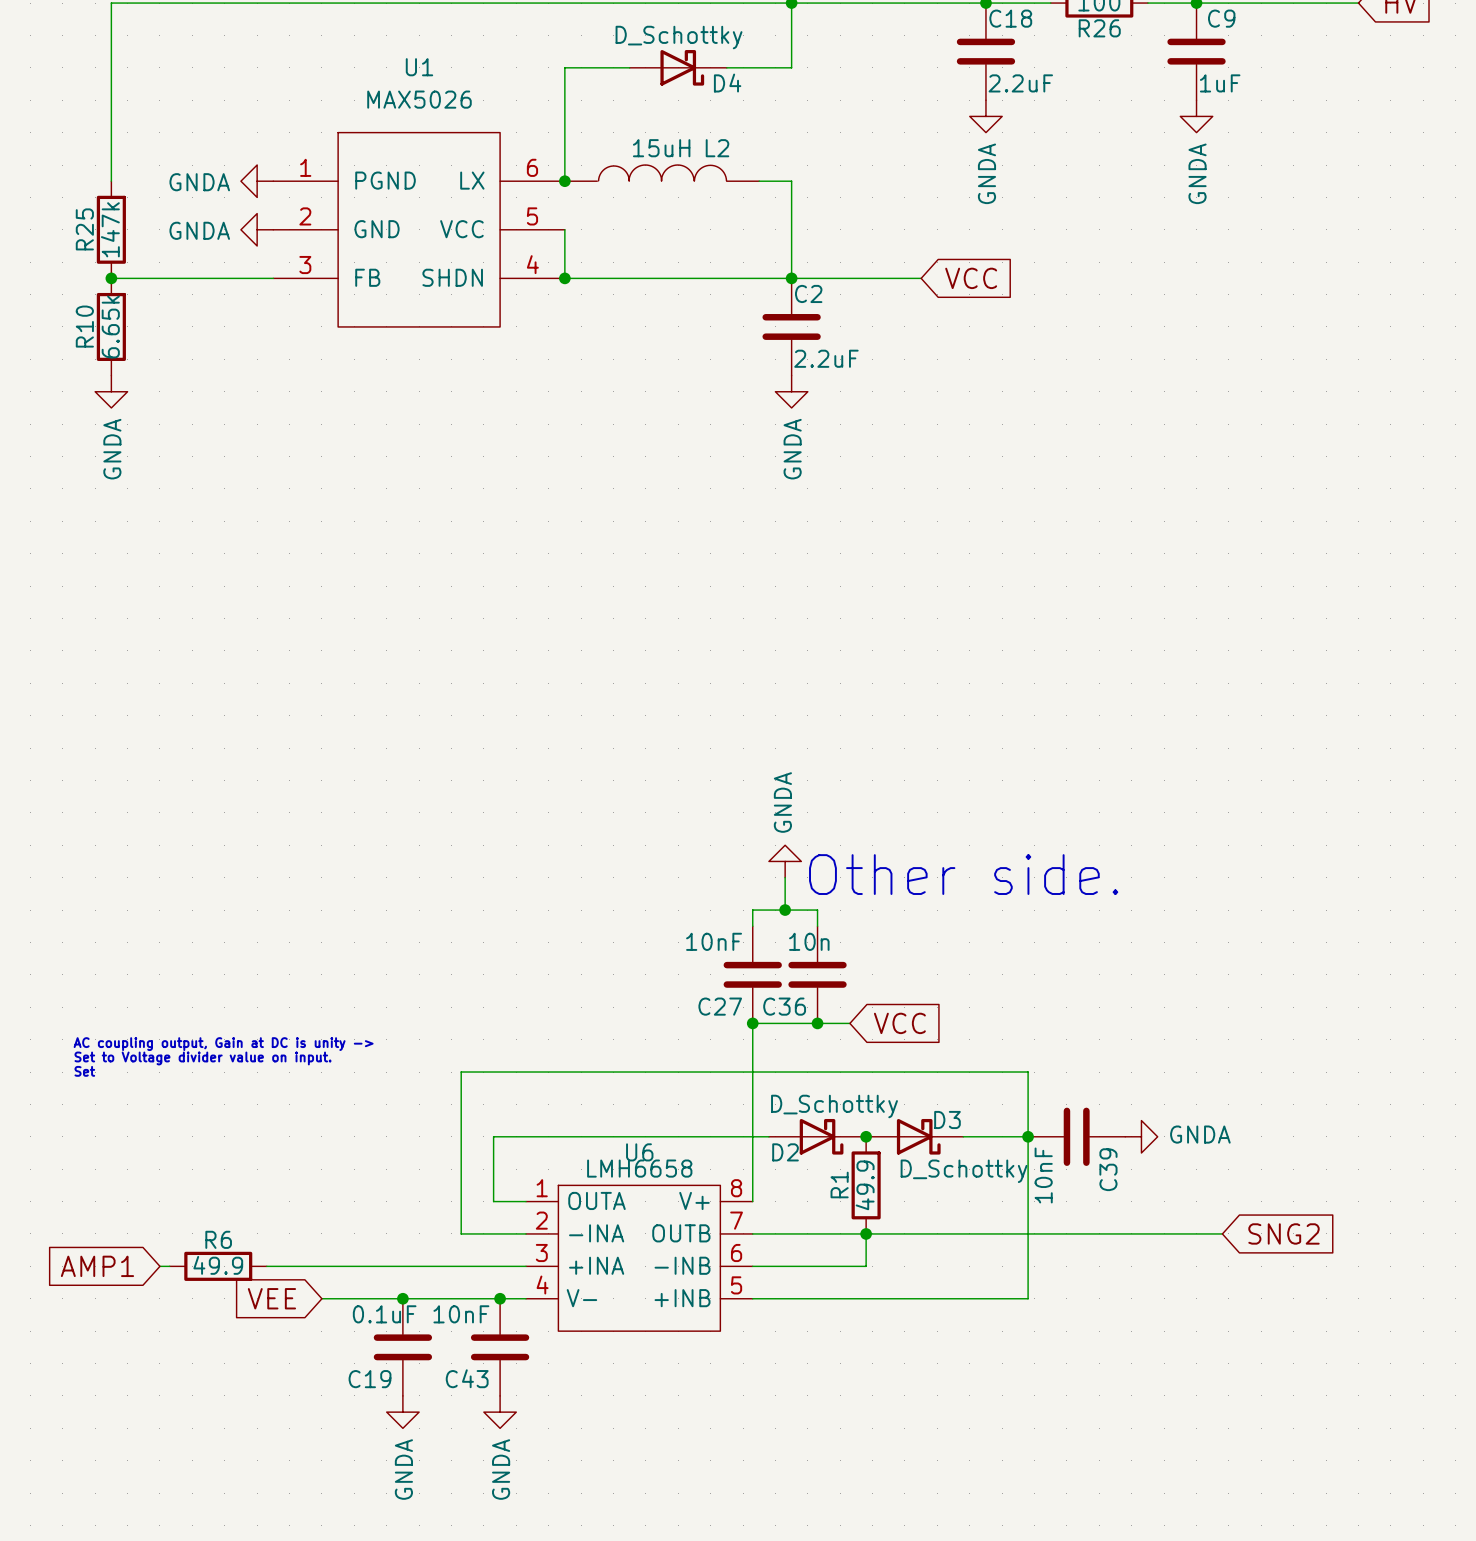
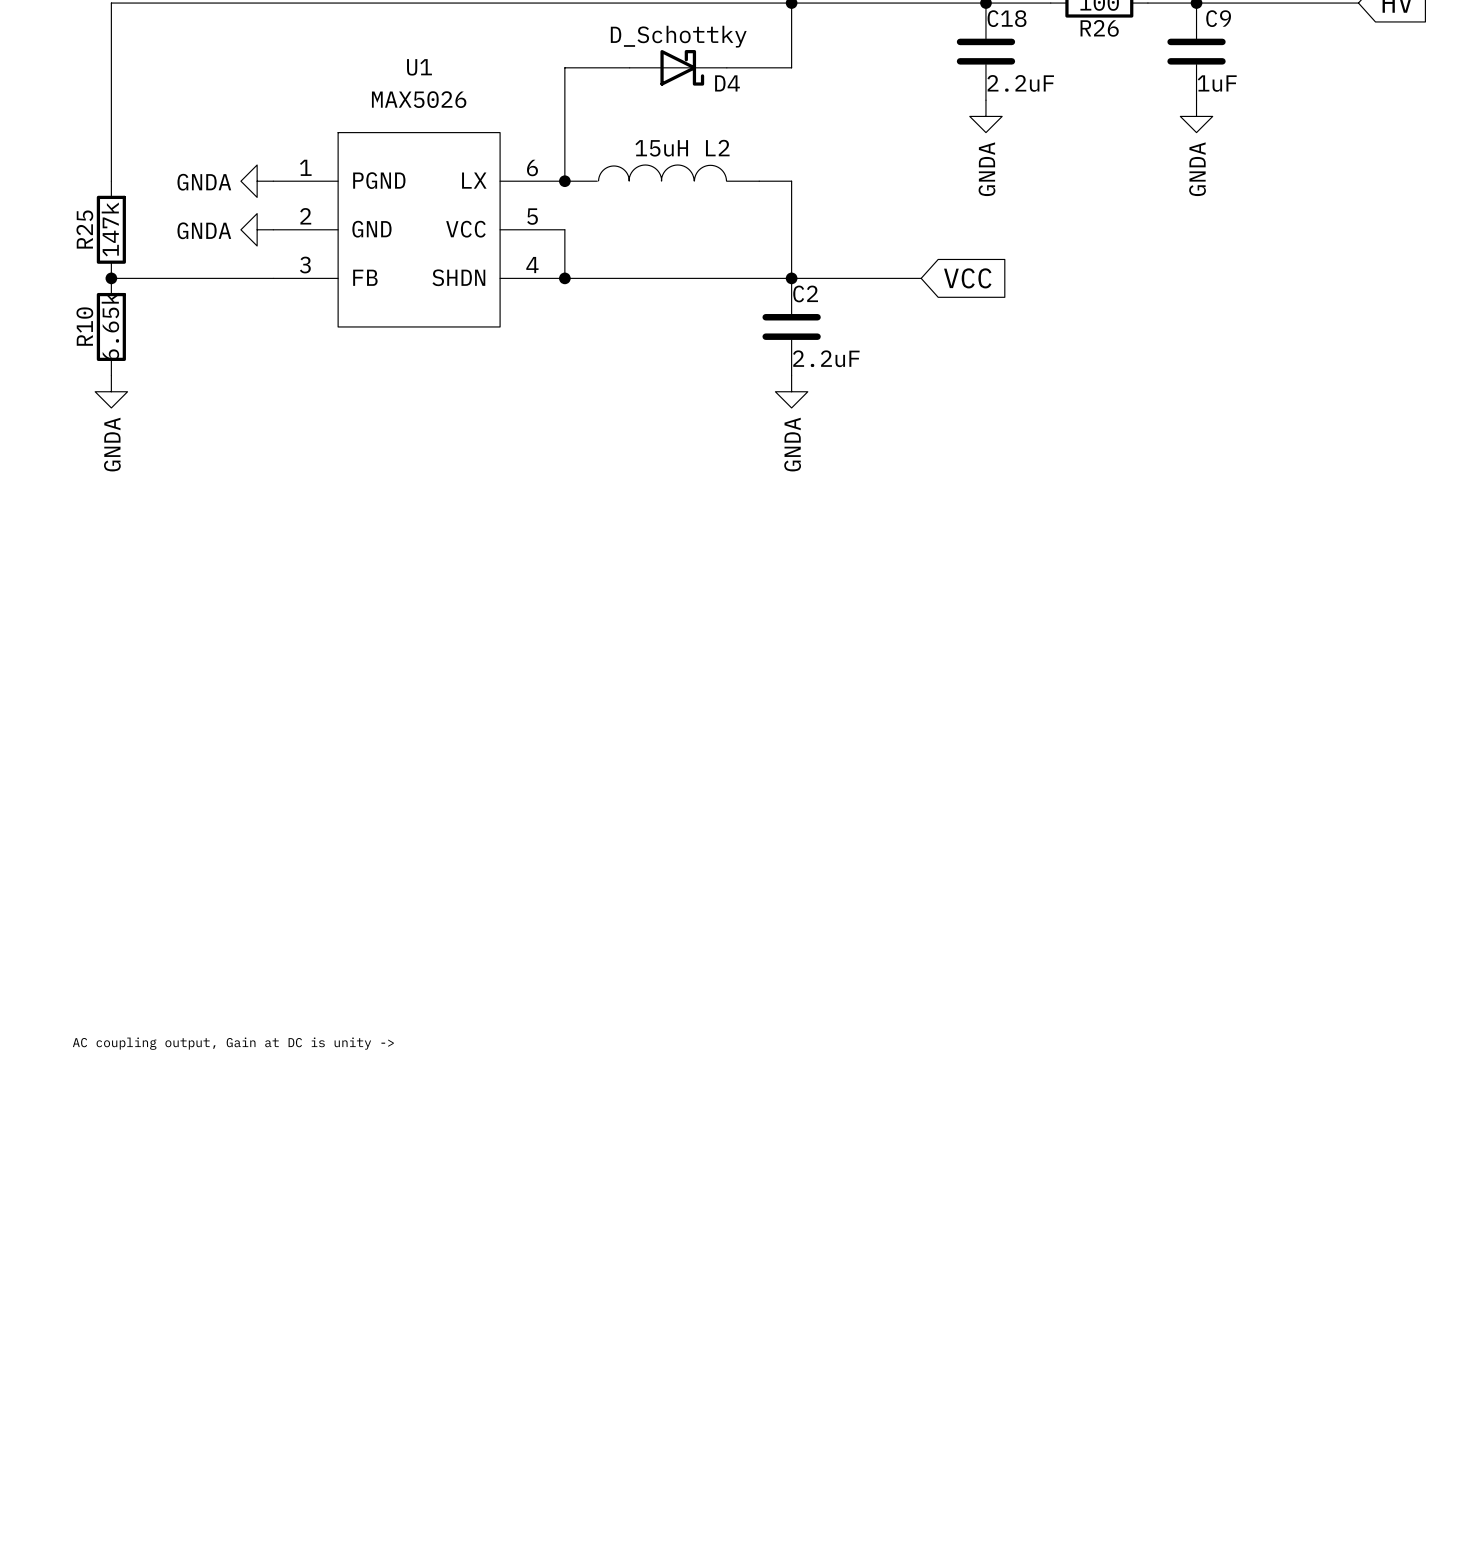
power symbol: GNDA (785, 861) -> none
text: Other side. (963, 874) -> none
wire: (785, 877) (785, 910) -> none
junction: (785, 910) -> none
wire: (752, 926) (752, 910) (817, 910) (817, 926) -> none
C27: 10nF (752, 974) -> none
C36: 10n (817, 974) -> none
junction: (752, 1023) -> none
junction: (817, 1023) -> none
wire: (849, 1023) (752, 1023) (752, 1201) -> none
global label: VCC (899, 1023) -> none
text: Set to Voltage divider value on input. (203, 1058) -> none
text: Set (84, 1071) -> none
wire: (768, 1136) (493, 1136) (493, 1201) (525, 1201) -> none
D2: D_Schottky (817, 1136) -> none
junction: (866, 1136) -> none
D3: D_Schottky (914, 1136) -> none
wire: (963, 1136) (1028, 1136) -> none
junction: (1028, 1136) -> none
C39: 10nF (1076, 1136) -> none
power symbol: GNDA (1141, 1136) -> none
R1: 49.9 (866, 1185) -> none
wire: (525, 1233) (461, 1233) (461, 1072) (1028, 1072) (1028, 1298) (752, 1298) -> none
wire: (752, 1233) (1222, 1233) -> none
wire: (866, 1233) (866, 1266) (752, 1266) -> none
junction: (866, 1233) -> none
global label: SNG2 (1283, 1233) -> none
U6: LMH6658 (639, 1258) -> none
global label: AMP1 (97, 1266) -> none
wire: (159, 1266) (169, 1266) -> none
R6: 49.9 (218, 1266) -> none
wire: (266, 1266) (525, 1266) -> none
global label: VEE (271, 1298) -> none
wire: (321, 1298) (525, 1298) -> none
junction: (402, 1298) -> none
junction: (500, 1298) -> none
C19: 0.1uF (402, 1347) -> none
C43: 10nF (500, 1347) -> none
power symbol: GNDA (402, 1412) -> none
power symbol: GNDA (500, 1412) -> none

